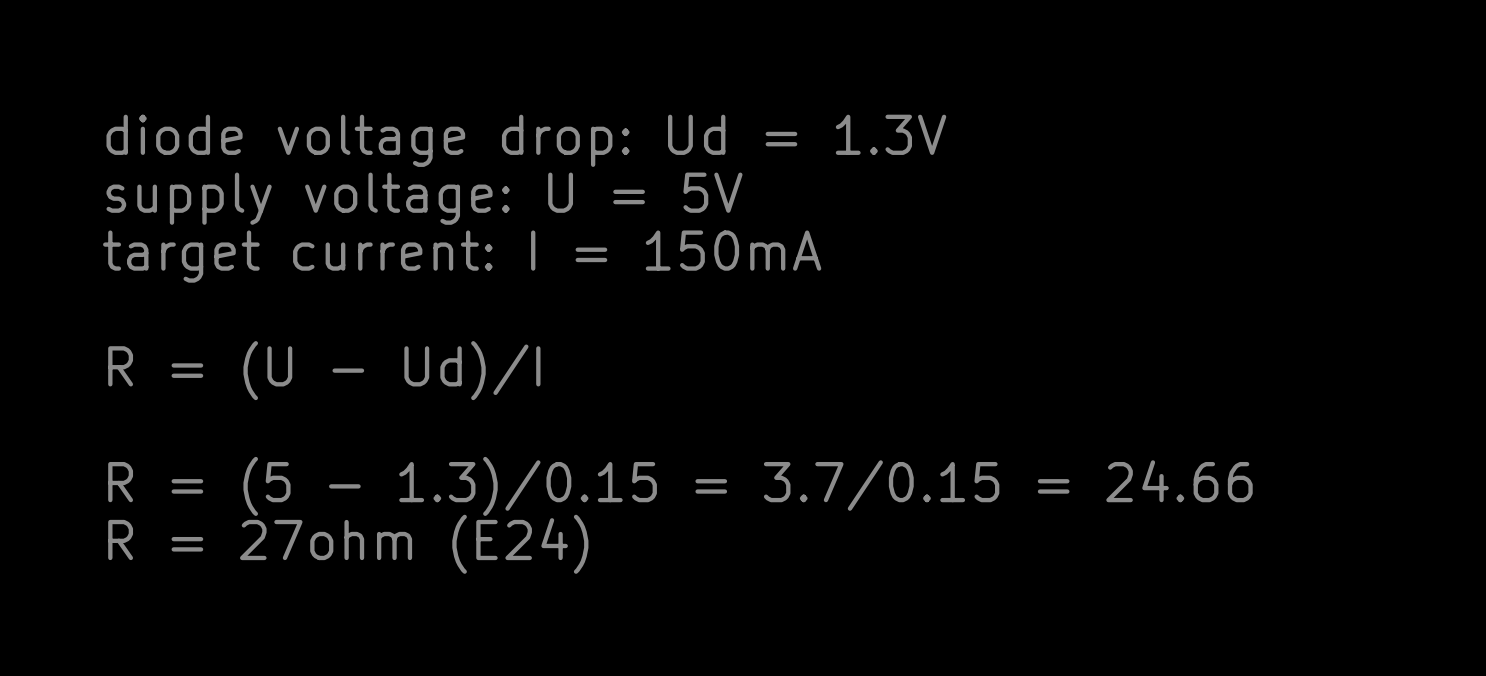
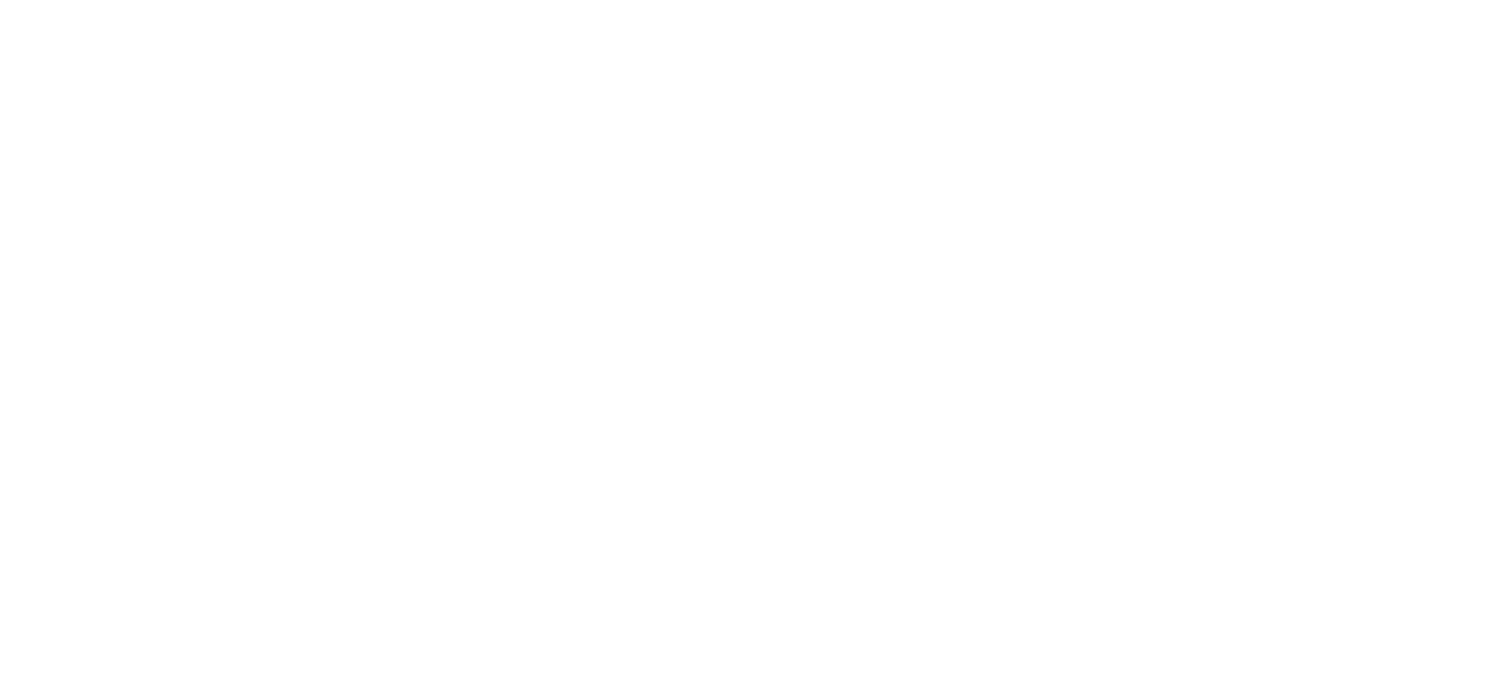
text: diode voltage drop: Ud = 1.3V (526, 140) -> none
text: supply voltage: U = 5V (424, 198) -> none
text: target current: I = 150mA (462, 256) -> none
text: R = (U - Ud)/I (324, 370) -> none
text: R = (5 - 1.3)/0.15 = 3.7/0.15 = 24.66 (680, 486) -> none
text: R = 27ohm (E24) (348, 544) -> none

